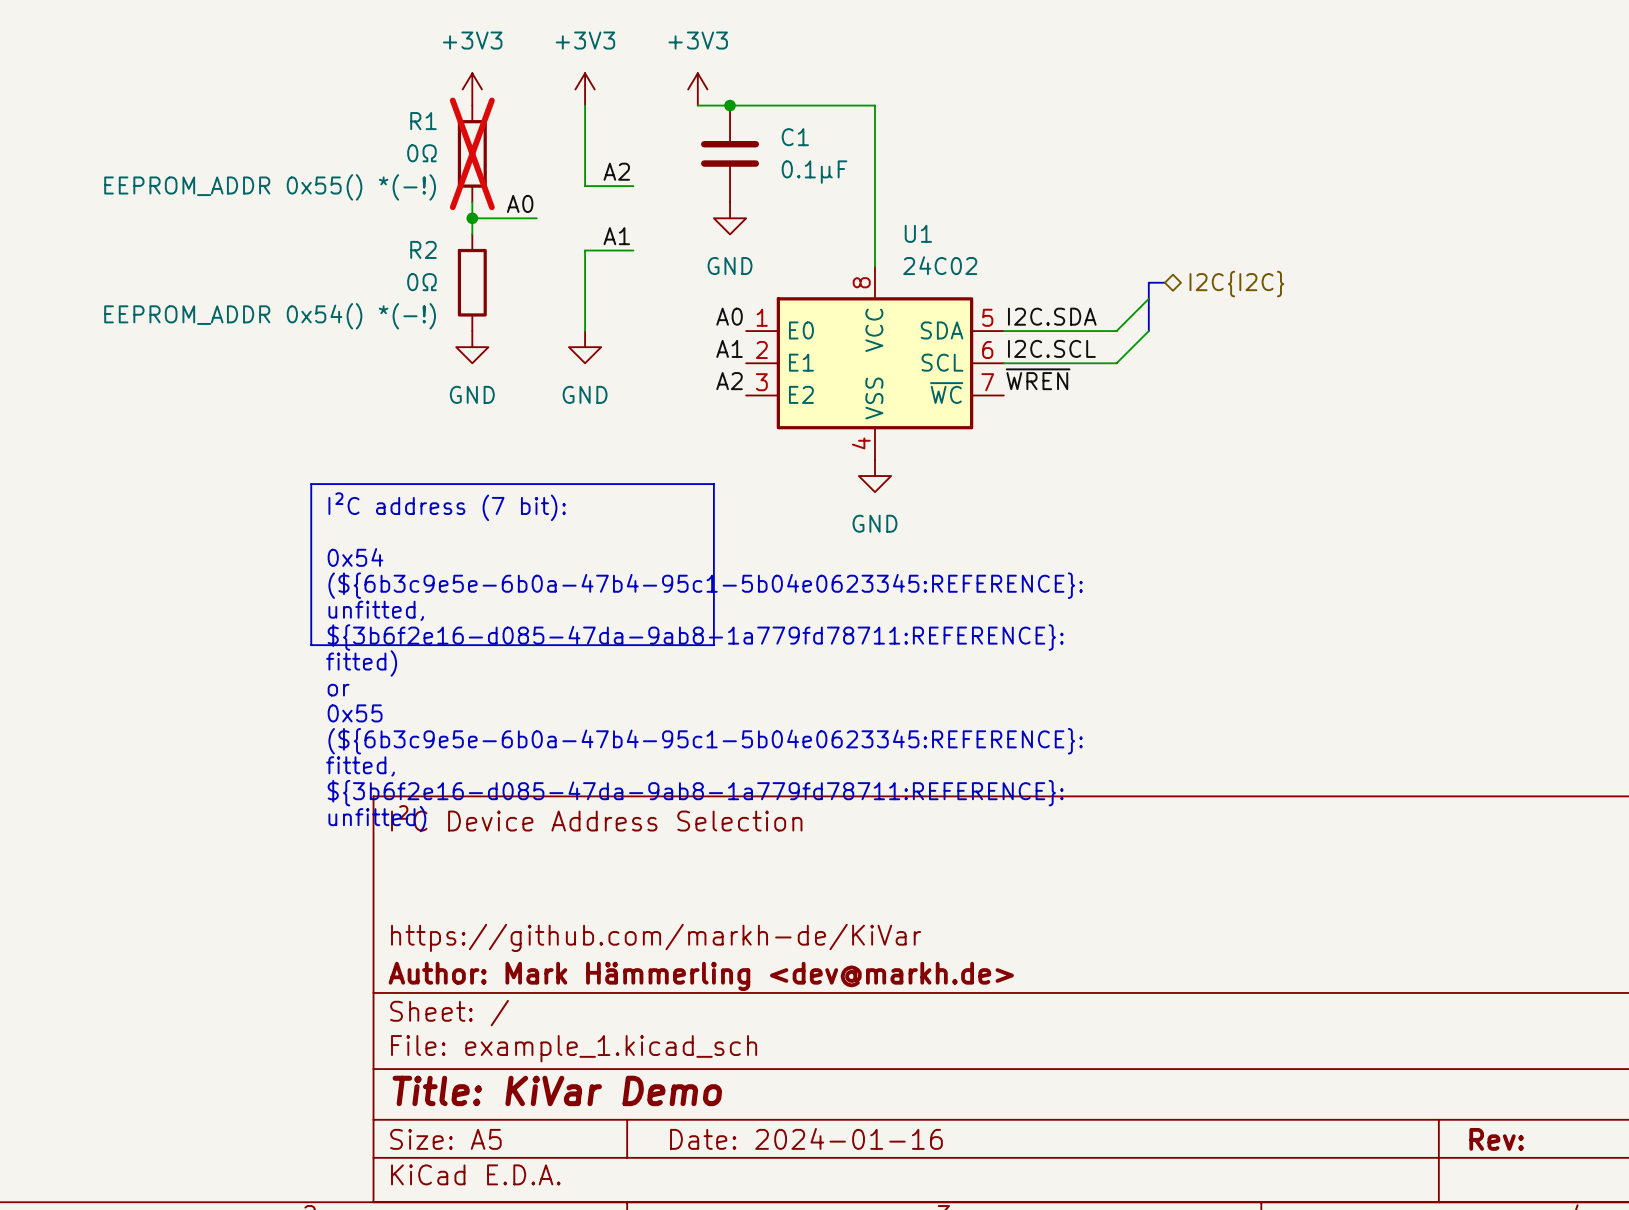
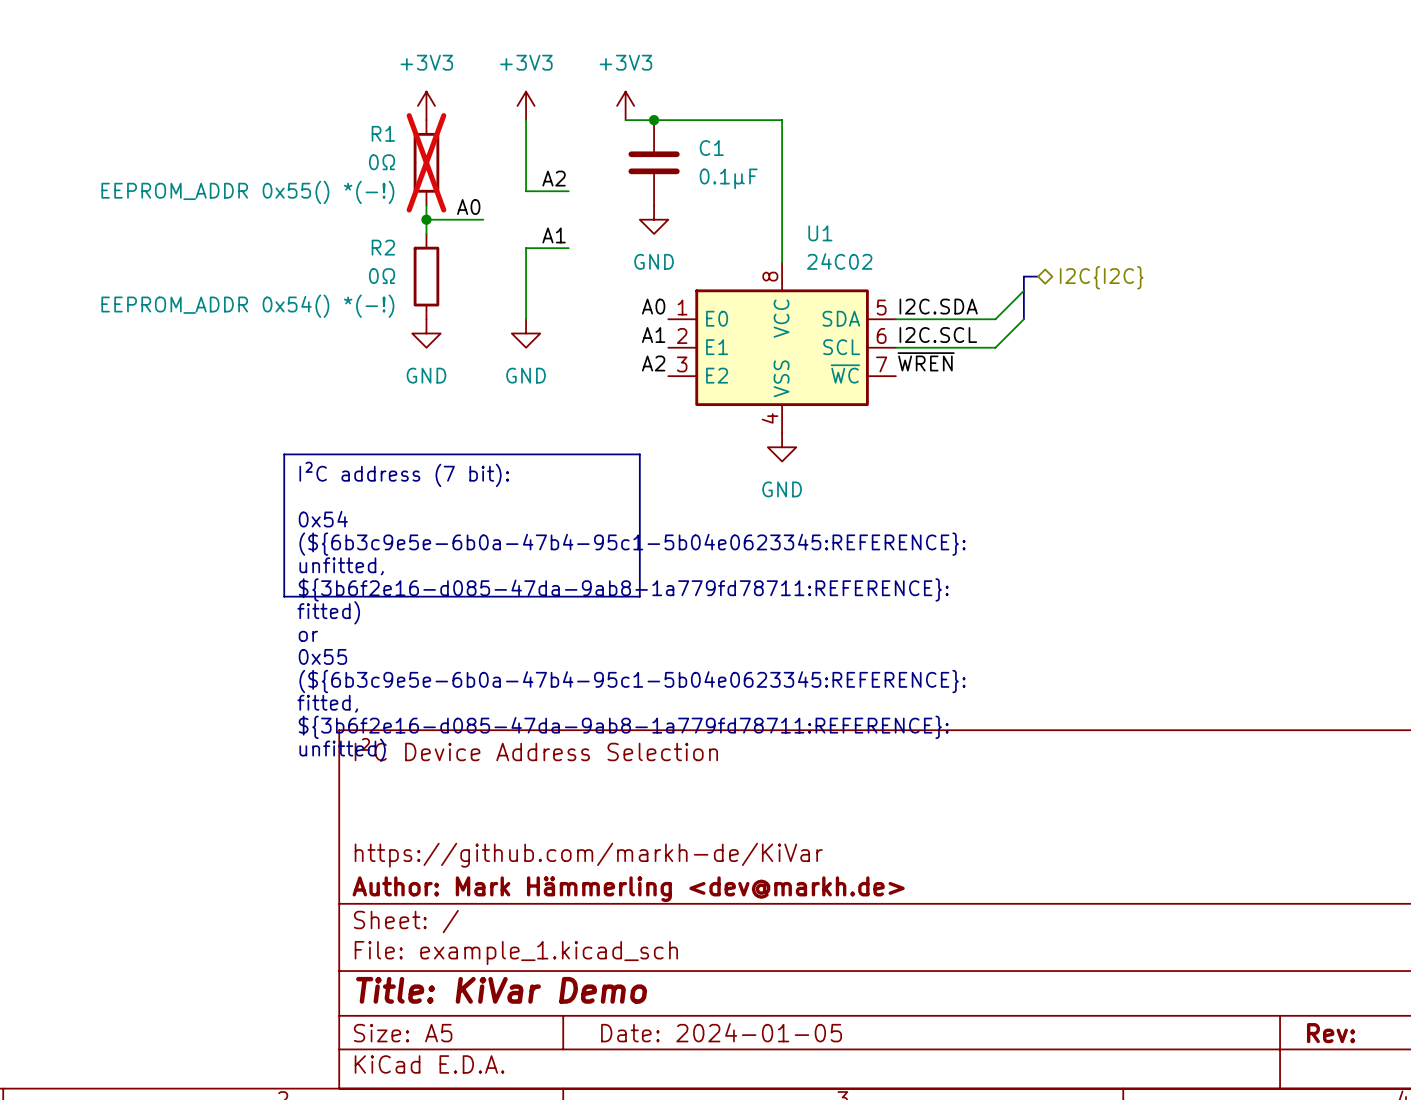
title block: Date: 2024-01-16 (806, 1138) -> Date: 2024-01-05 (721, 1032)

